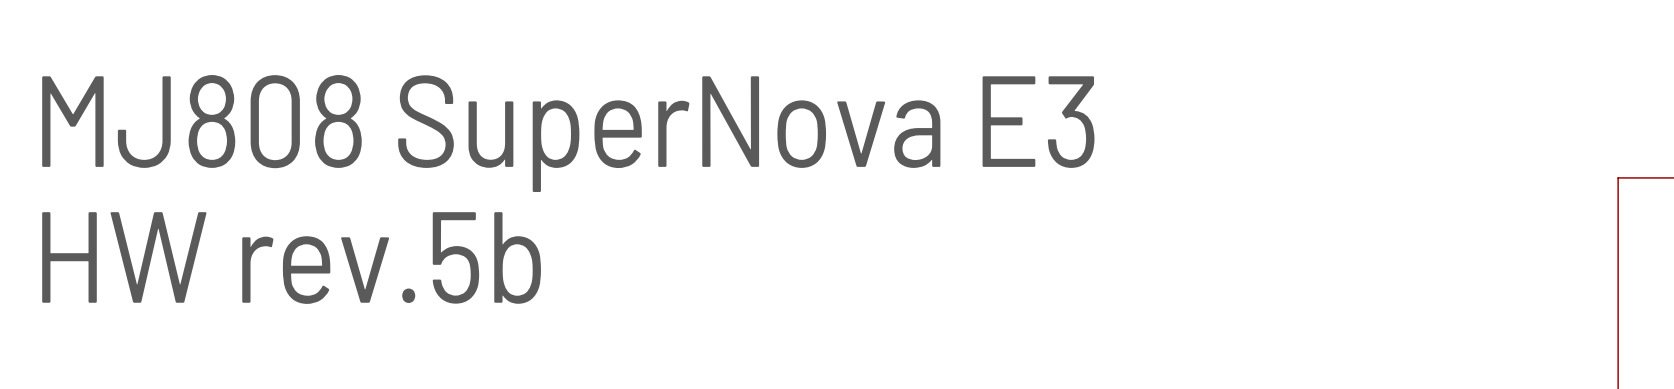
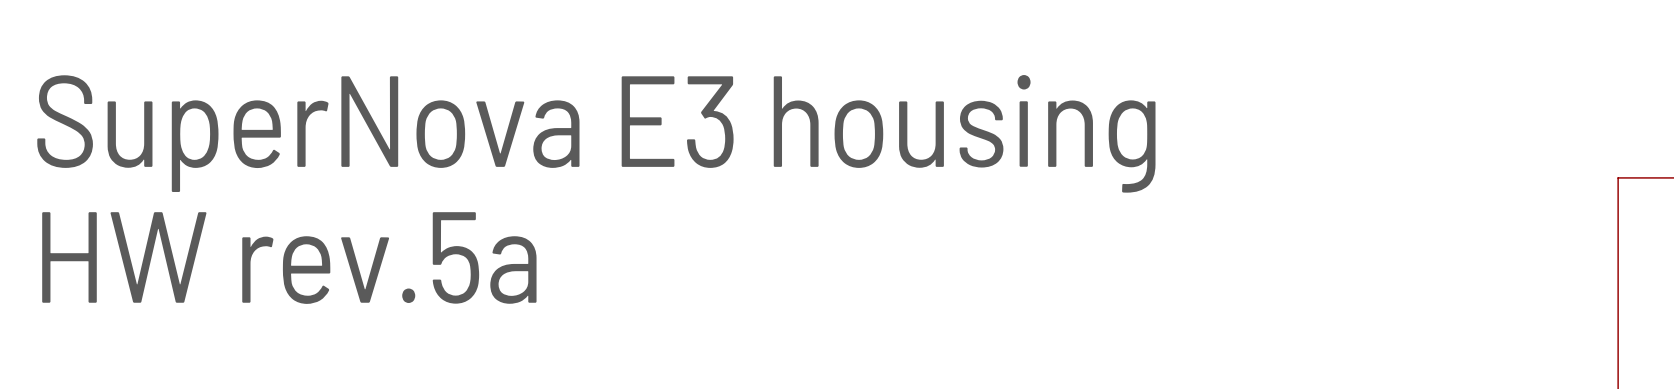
text: MJ808 SuperNova E3 (568, 133) -> SuperNova E3 housing (596, 133)
text: HW rev.5b (291, 258) -> HW rev.5a (289, 258)

